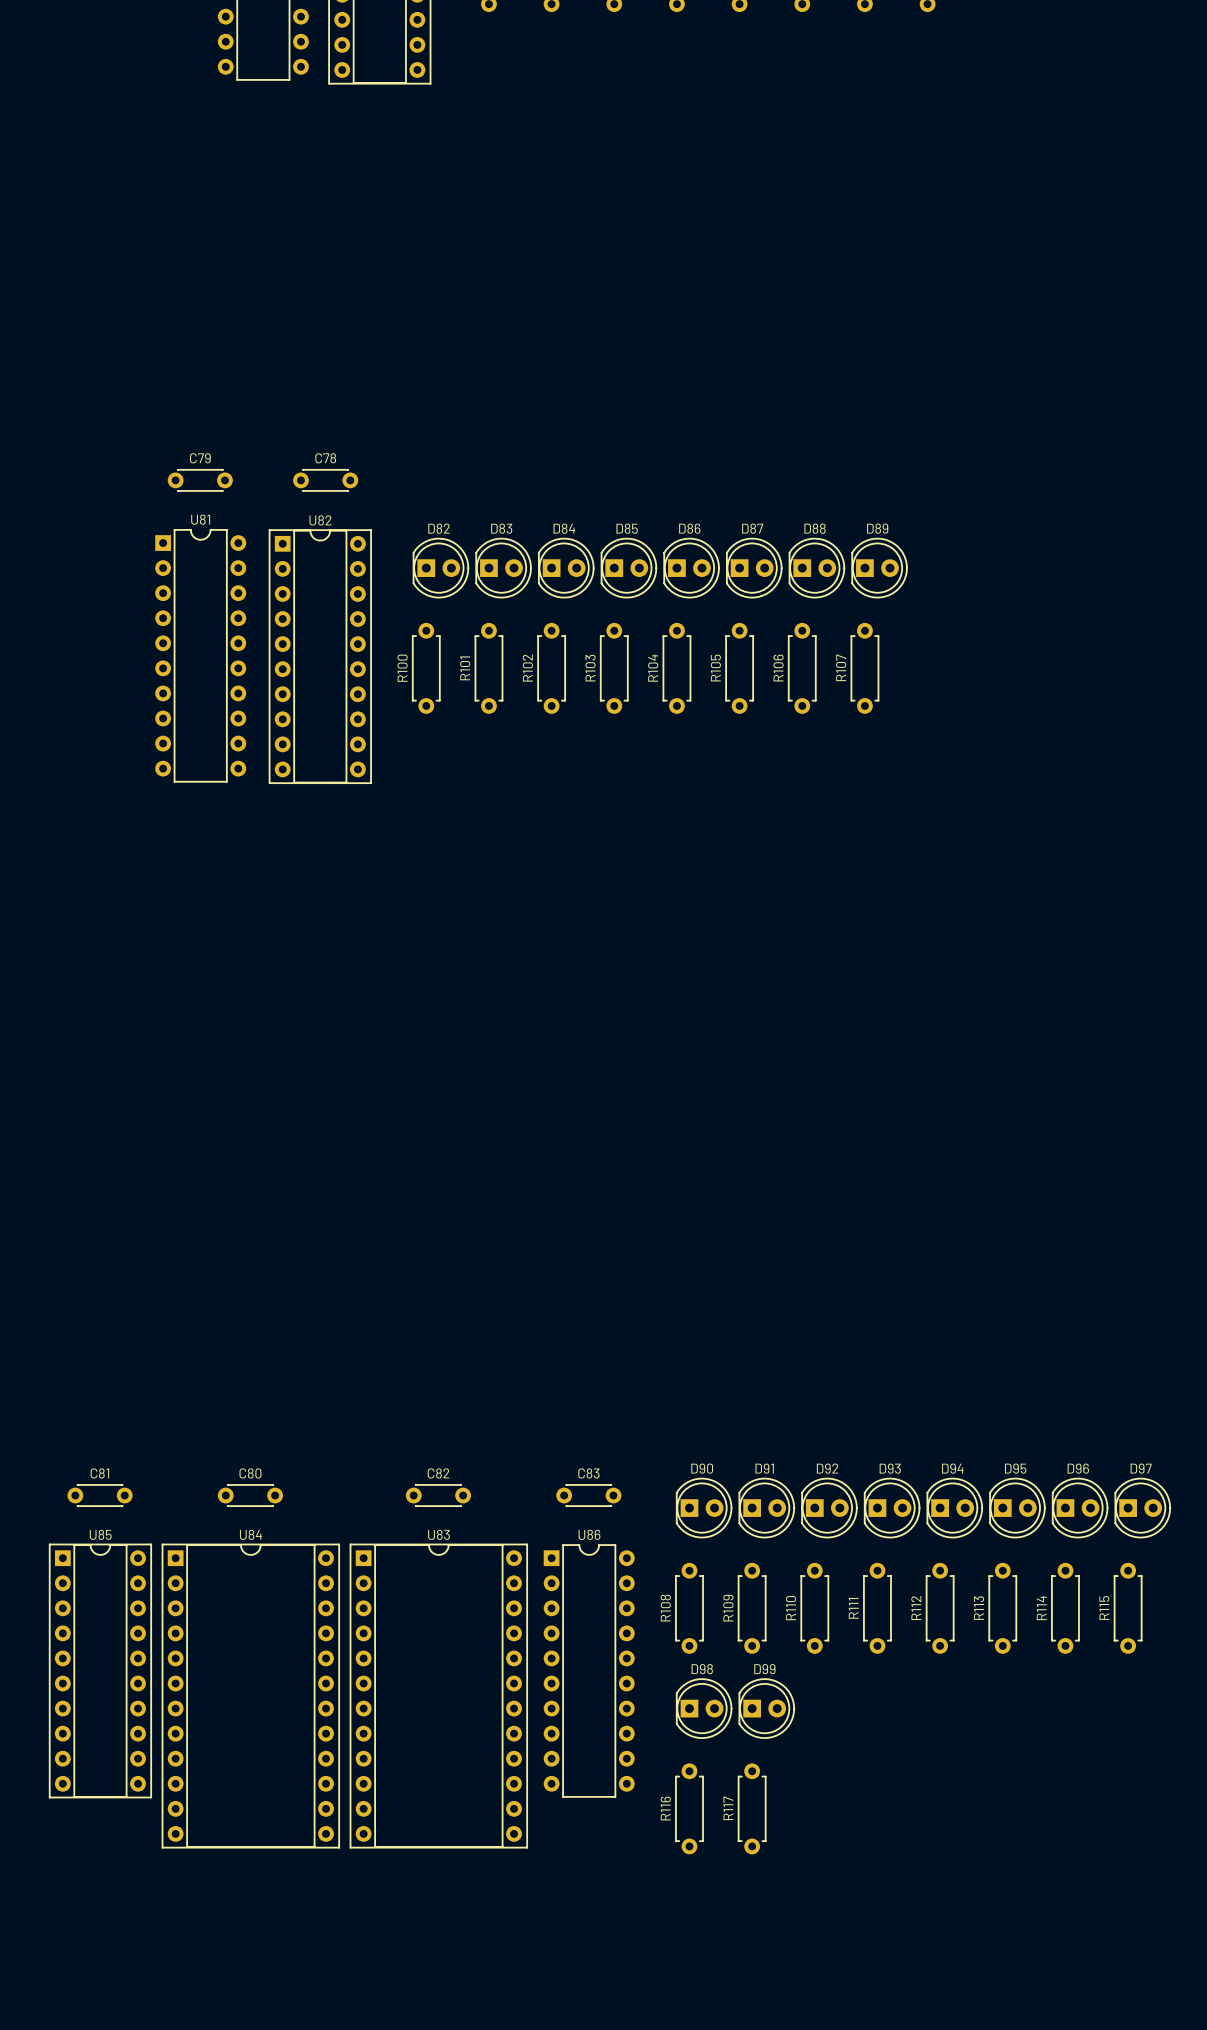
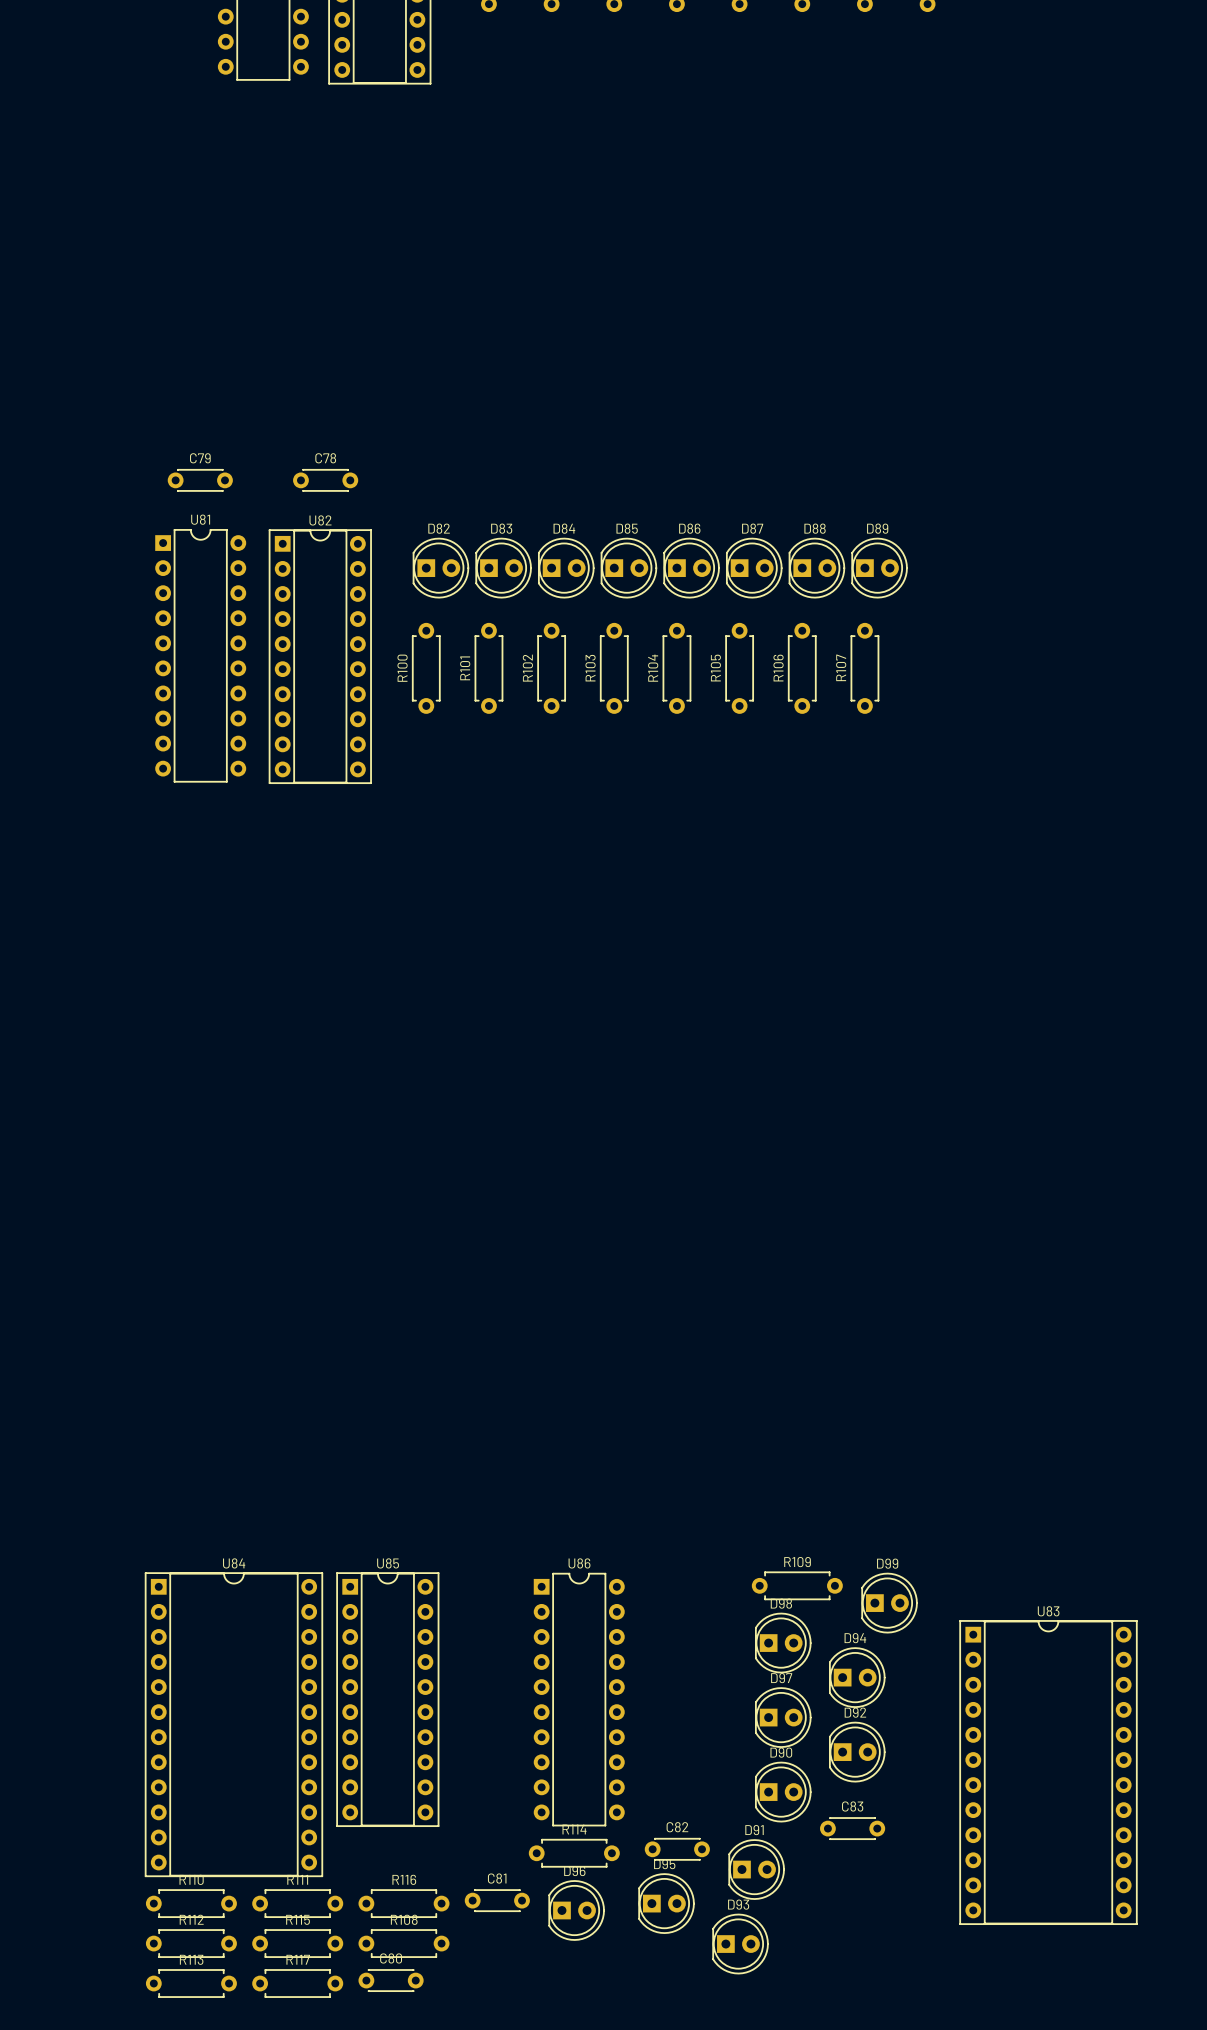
C81 position: (100, 1495) -> (497, 1900)
C80 position: (250, 1495) -> (391, 1980)
C82 position: (438, 1495) -> (677, 1849)
C83 position: (588, 1495) -> (852, 1828)
D90 position: (704, 1508) -> (783, 1792)
D91 position: (766, 1508) -> (756, 1869)
D92 position: (829, 1508) -> (857, 1752)
D93 position: (892, 1508) -> (740, 1944)
D94 position: (954, 1508) -> (857, 1677)
D95 position: (1017, 1508) -> (666, 1903)
D96 position: (1080, 1508) -> (576, 1910)
D97 position: (1142, 1508) -> (783, 1717)
R108 rotation: 0° (689, 1608) -> 90° clockwise (403, 1943)
R108 position: (689, 1608) -> (403, 1943)
R109 rotation: 0° (752, 1608) -> 90° clockwise (797, 1585)
R110 rotation: 0° (814, 1608) -> 90° clockwise (191, 1903)
R110 position: (814, 1608) -> (191, 1903)
R111 rotation: 0° (877, 1608) -> 90° clockwise (297, 1903)
R111 position: (877, 1608) -> (297, 1903)
R112 rotation: 0° (940, 1608) -> 90° clockwise (191, 1943)
R112 position: (940, 1608) -> (191, 1943)
R113 rotation: 0° (1002, 1608) -> 90° clockwise (191, 1983)
R113 position: (1002, 1608) -> (191, 1983)
R114 rotation: 0° (1065, 1608) -> 90° clockwise (574, 1853)
R114 position: (1065, 1608) -> (574, 1853)
R115 rotation: 0° (1128, 1608) -> 90° clockwise (297, 1943)
R115 position: (1128, 1608) -> (297, 1943)
U85 position: (100, 1670) -> (387, 1699)
U86 position: (589, 1670) -> (579, 1699)
D98 footprint: [676, 1678, 733, 1739] -> [755, 1612, 812, 1674]
U84 position: (250, 1696) -> (233, 1724)
U83 position: (438, 1696) -> (1048, 1772)
D99 position: (766, 1708) -> (889, 1603)
R116 rotation: 0° (689, 1808) -> 90° clockwise (403, 1903)
R116 position: (689, 1808) -> (403, 1903)
R117 rotation: 0° (752, 1808) -> 90° clockwise (297, 1983)
R117 position: (752, 1808) -> (297, 1983)

